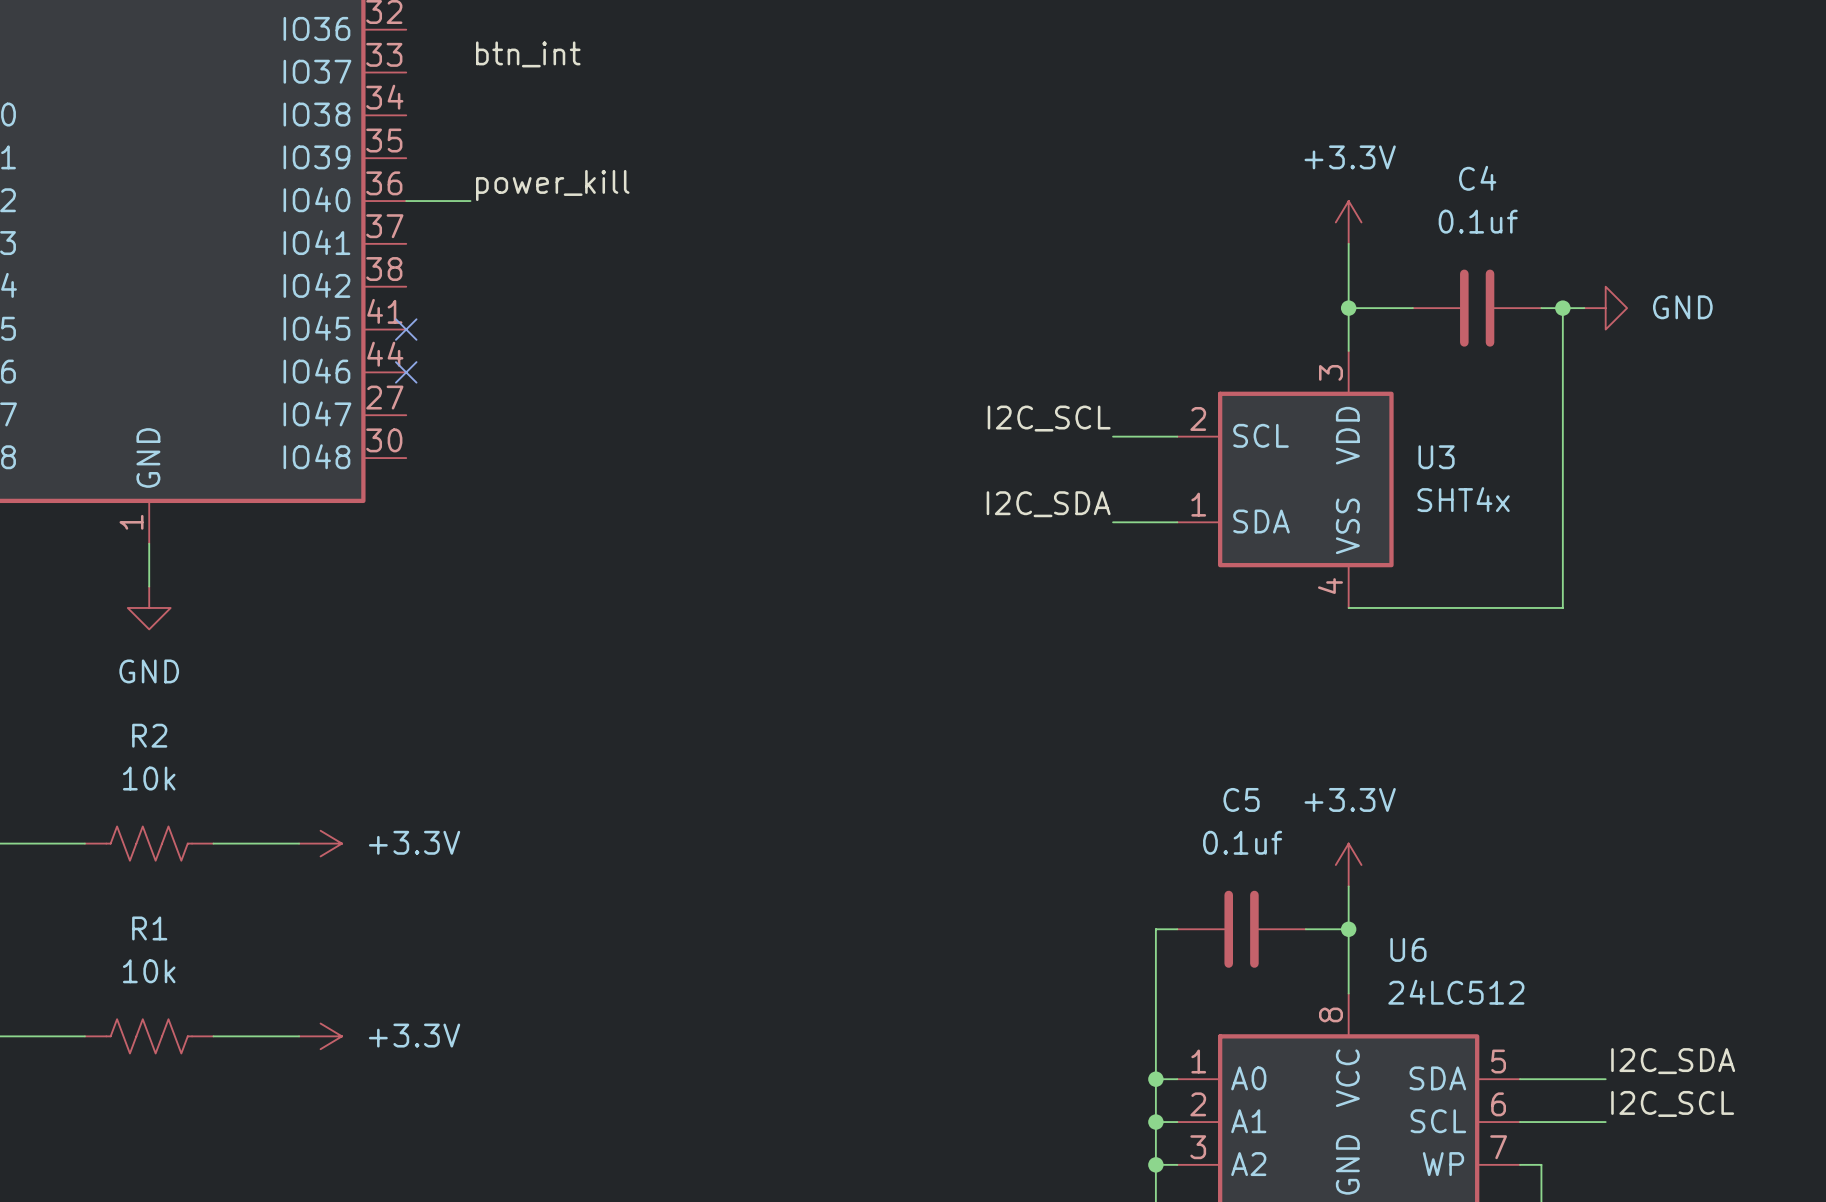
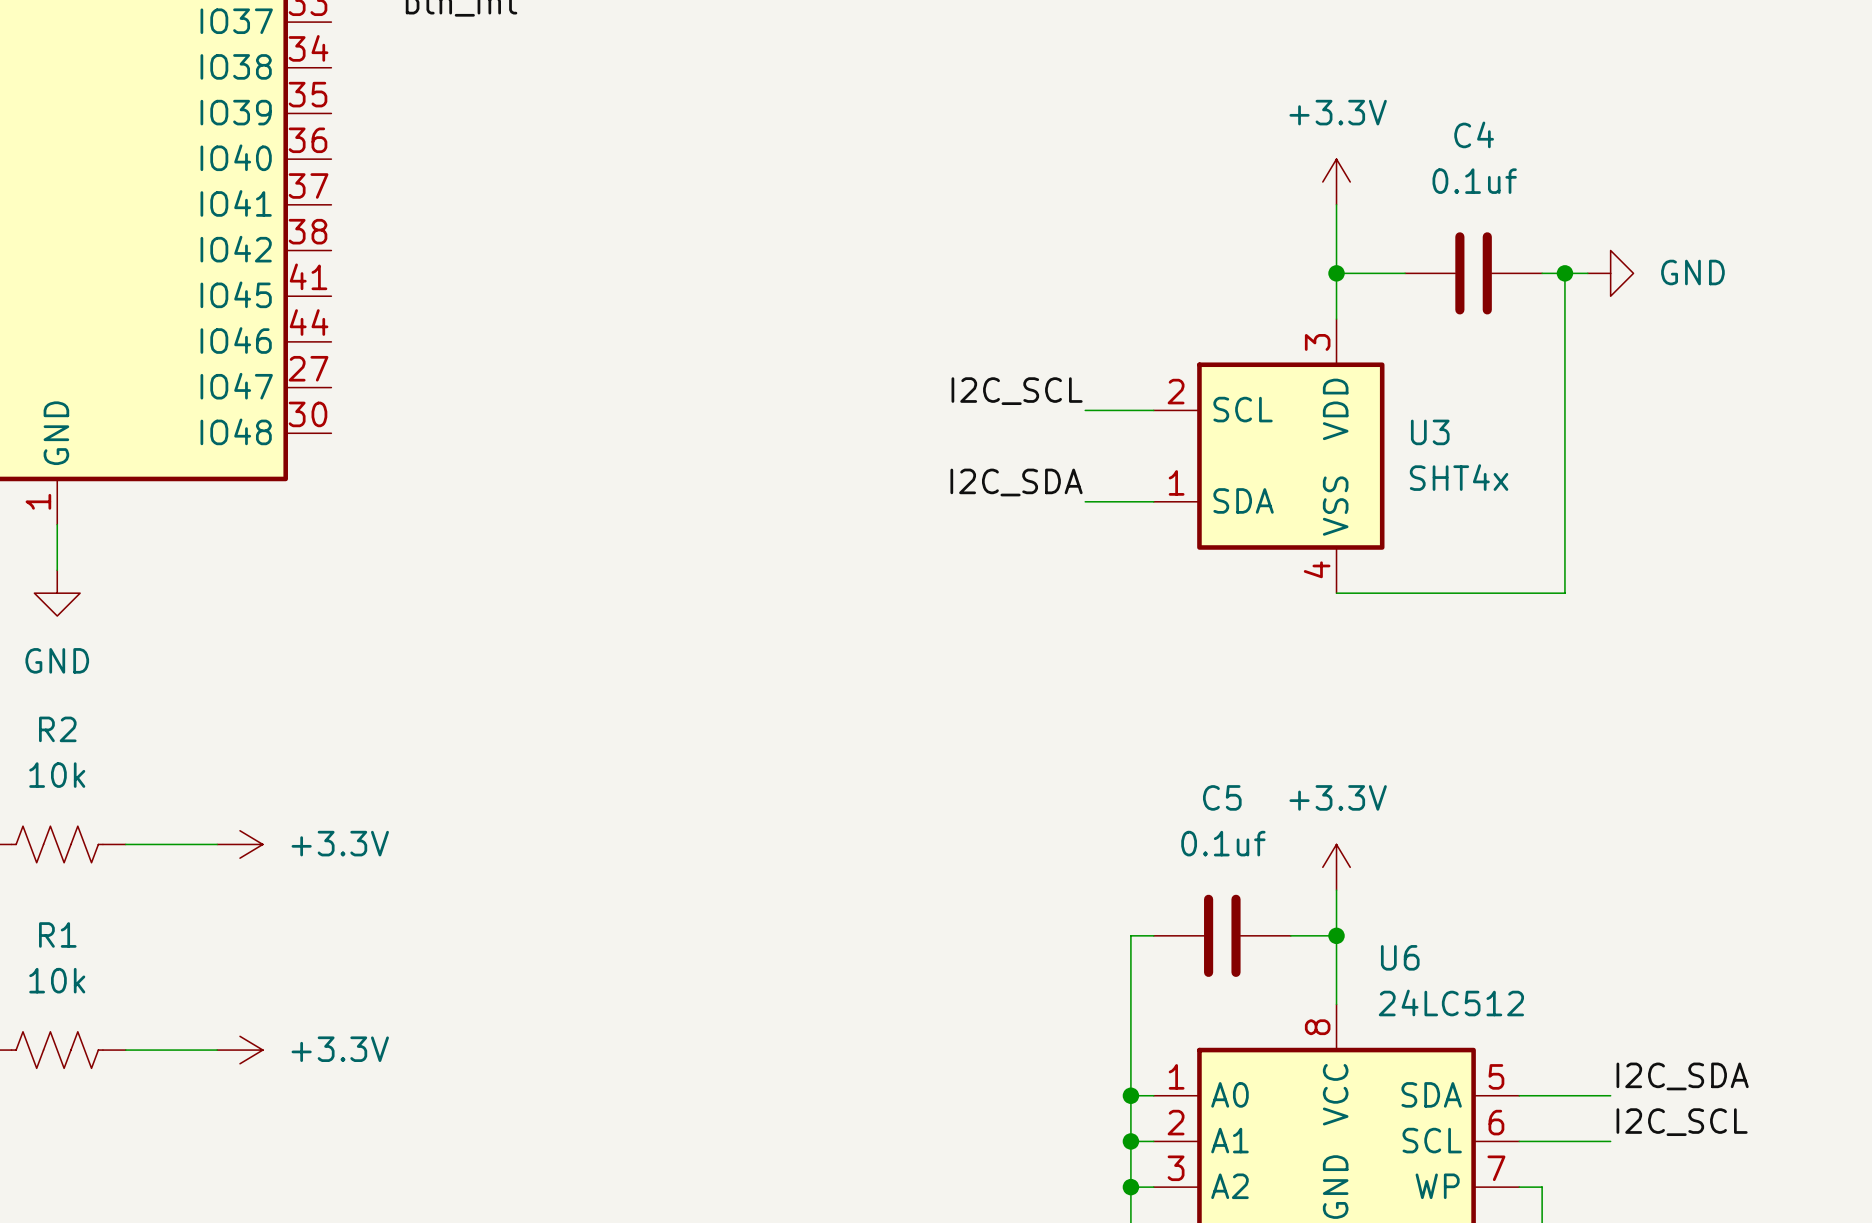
label: power_kill (552, 185) -> none
wire: (406, 201) (470, 201) -> none
no-connect mark: (406, 329) -> none
no-connect mark: (406, 372) -> none

